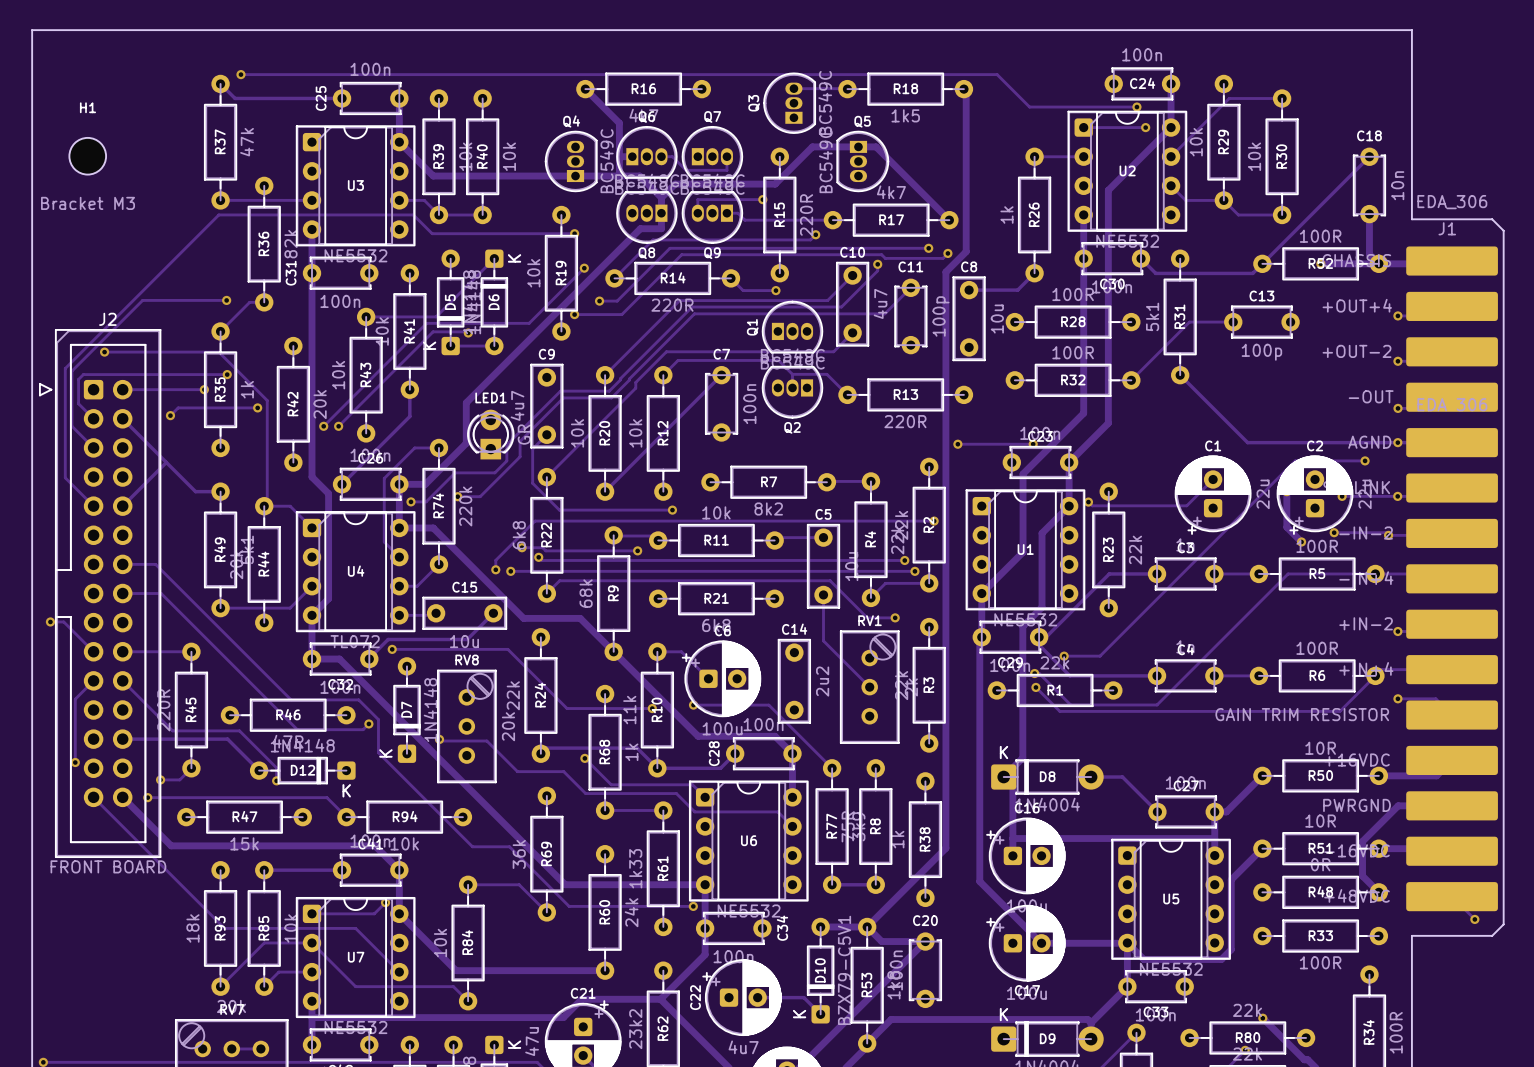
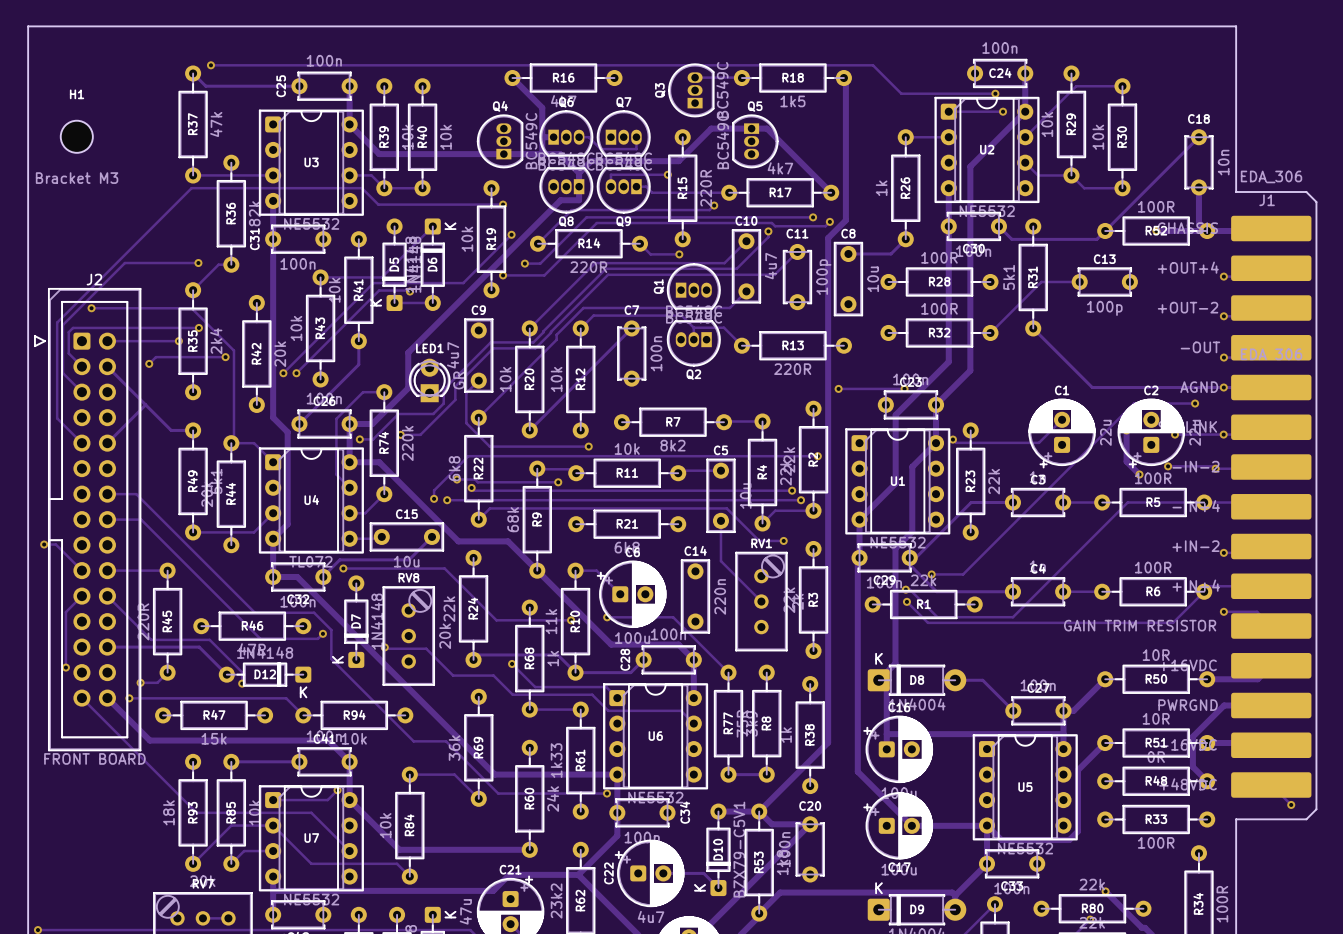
R35 value: 1k (247, 389) -> 2k4 (216, 341)
C14 value: 2u2 (822, 681) -> 220n (720, 596)

